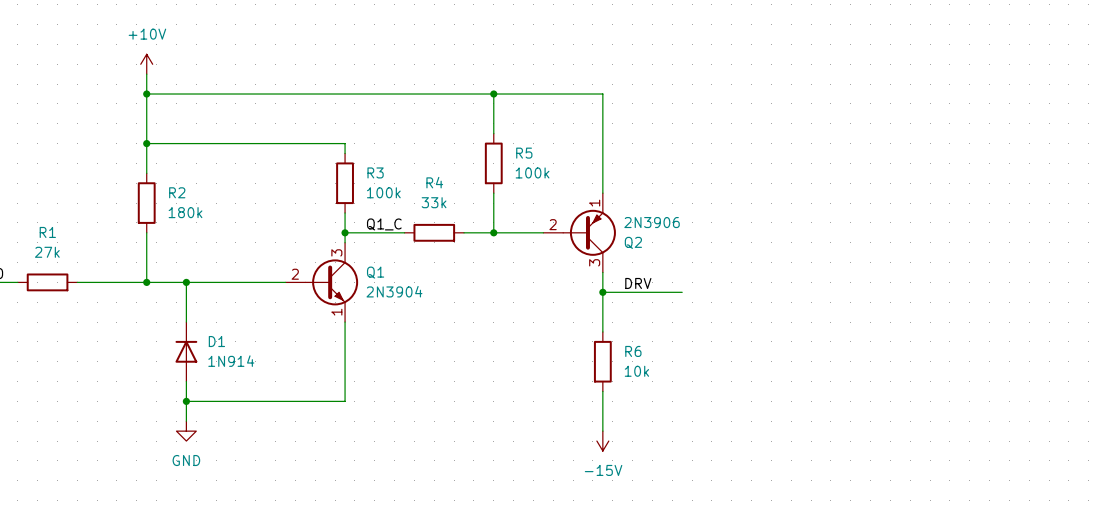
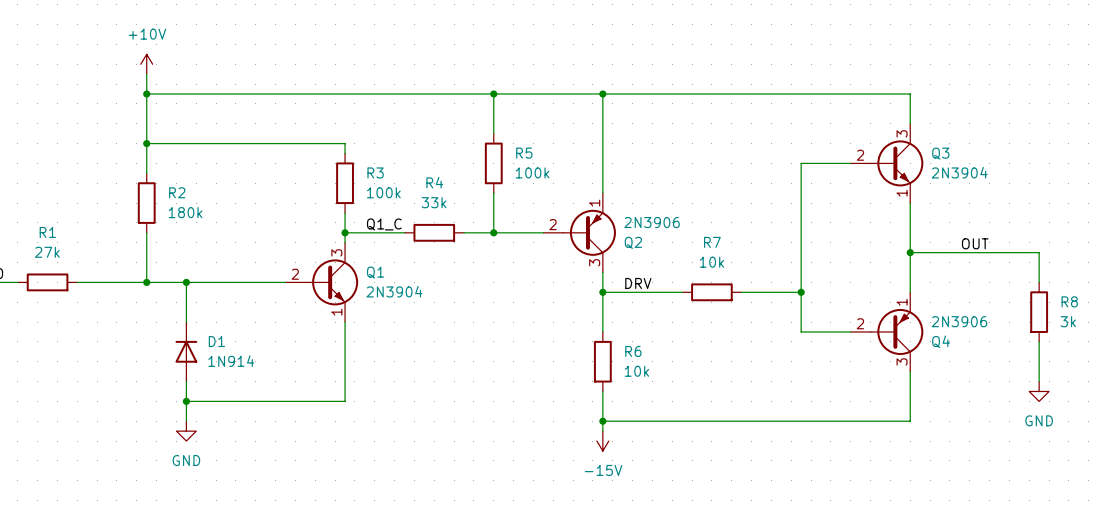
wire: none -> (602, 94) (910, 94) (910, 123)
junction: none -> (602, 94)
wire: none -> (850, 163) (801, 163) (801, 331) (850, 331)
Q3: none -> 2N3904 (887, 163)
wire: none -> (910, 203) (910, 292)
label: none -> OUT (975, 243)
wire: none -> (910, 252) (1039, 252) (1039, 282)
junction: none -> (910, 252)
R7: none -> 10k (711, 292)
wire: none -> (741, 292) (801, 292)
junction: none -> (801, 292)
R8: none -> 3k (1039, 312)
Q4: none -> 2N3906 (887, 331)
wire: none -> (1039, 341) (1039, 381)
wire: none -> (910, 371) (910, 421) (602, 421)
power symbol: none -> GND (1039, 391)
junction: none -> (602, 421)

